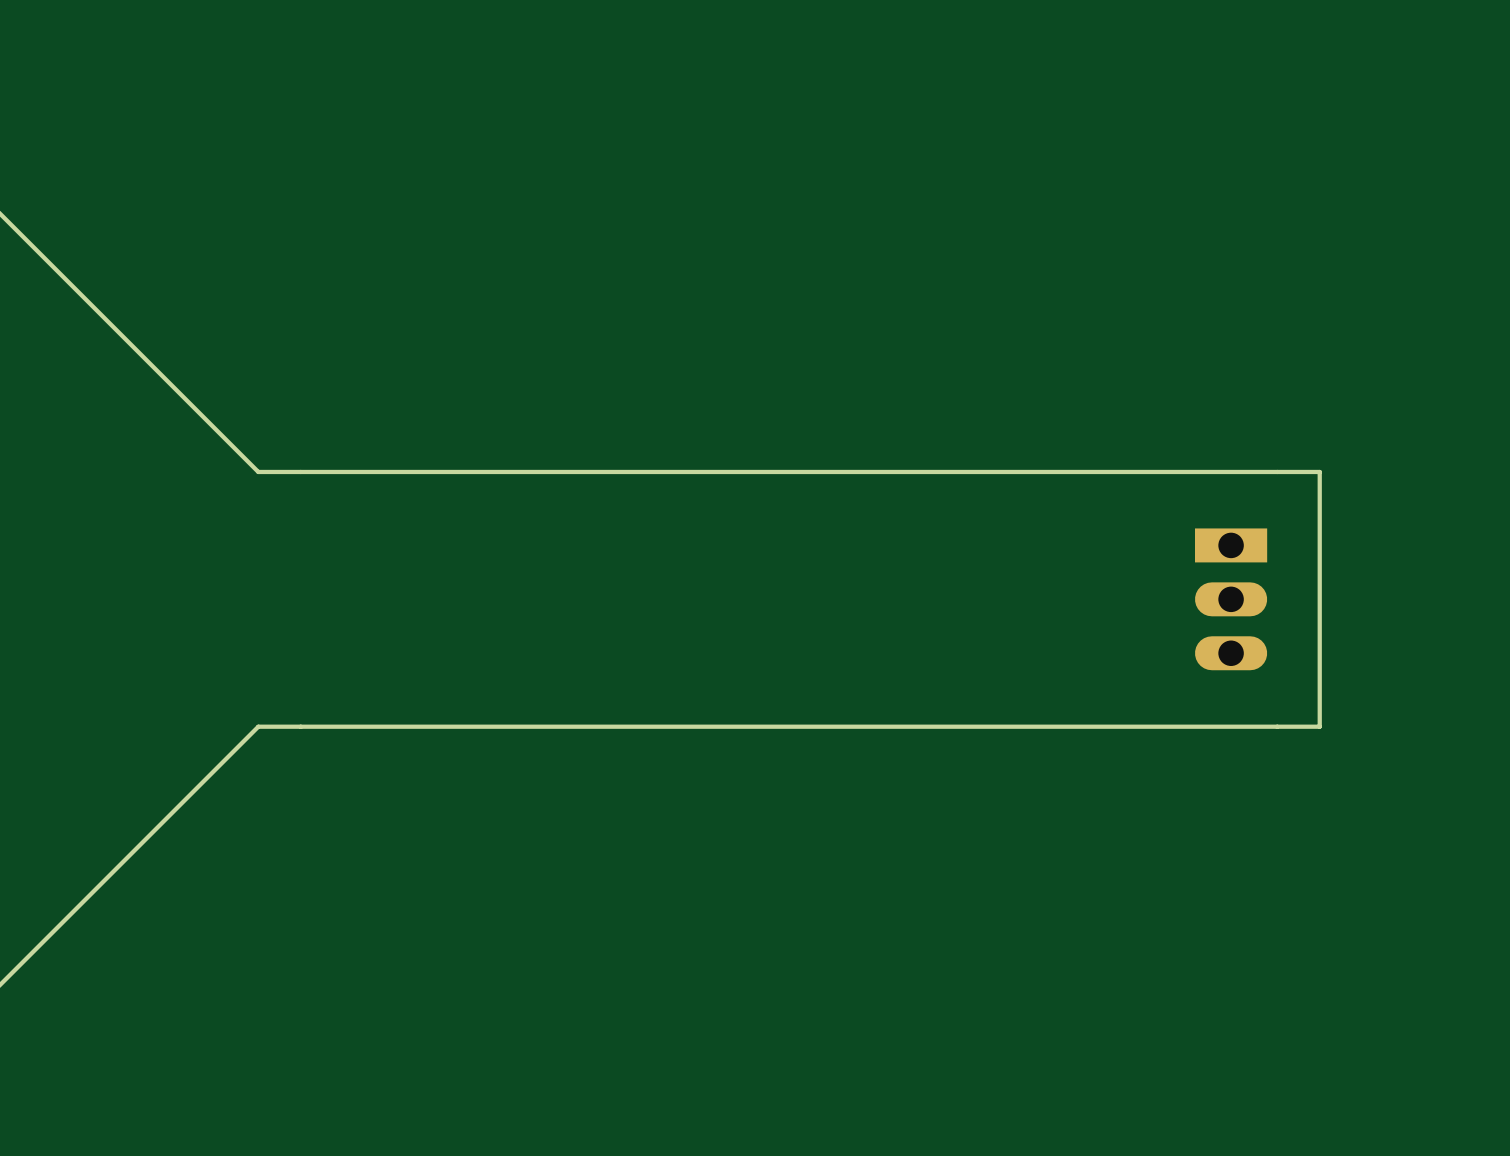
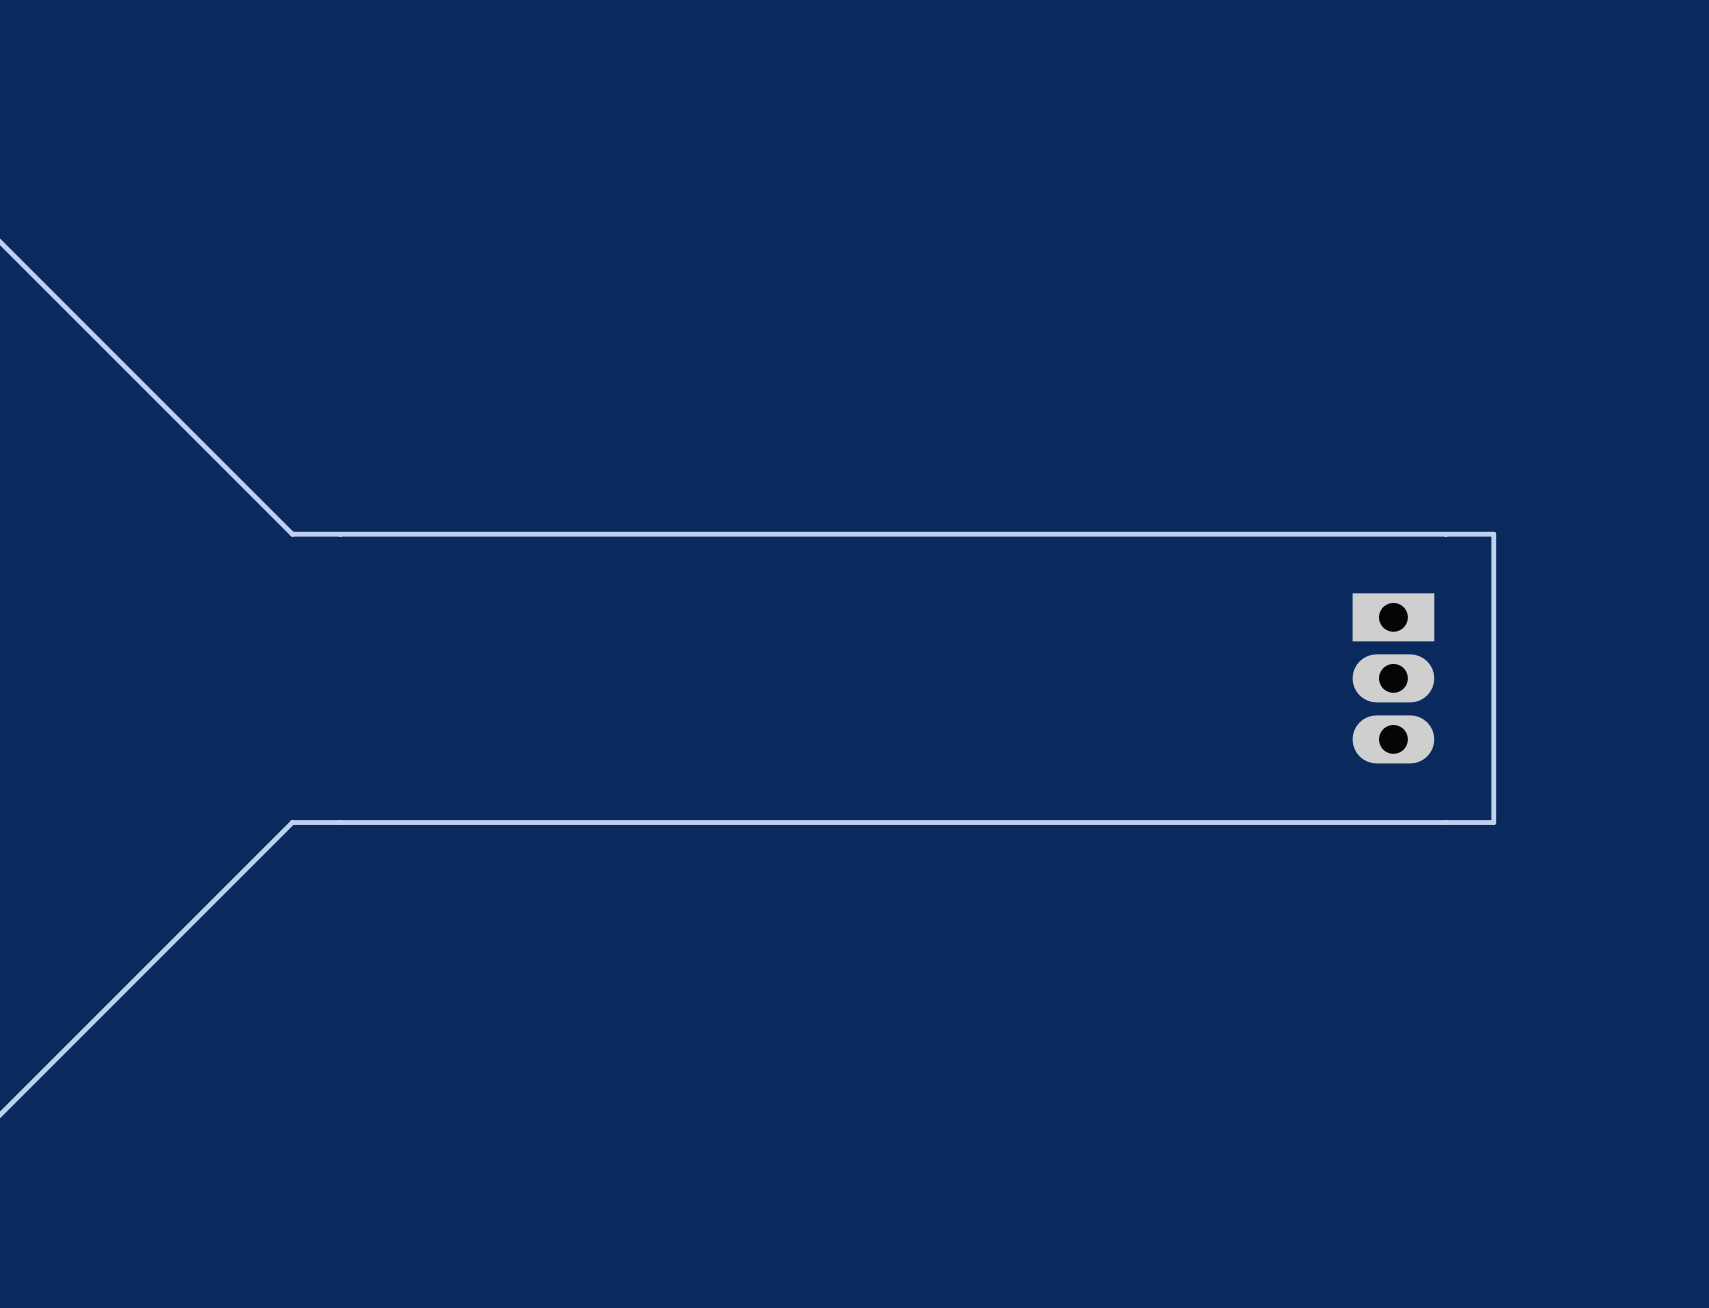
part footprint: [1195, 528, 1268, 671] -> [1352, 593, 1435, 764]

